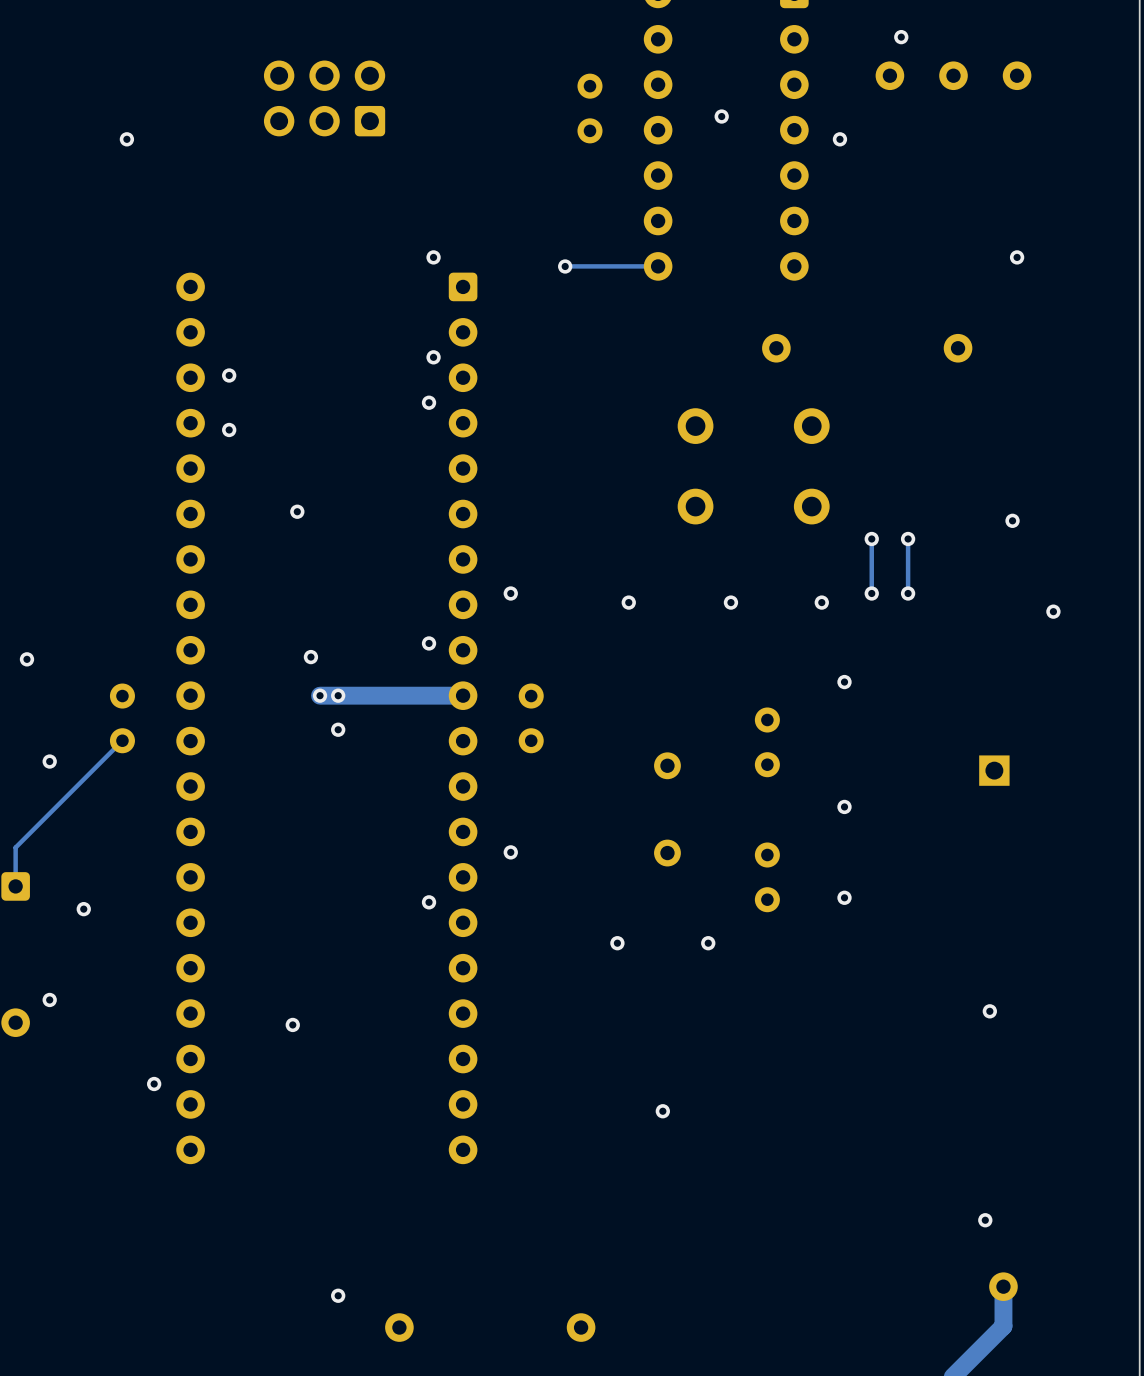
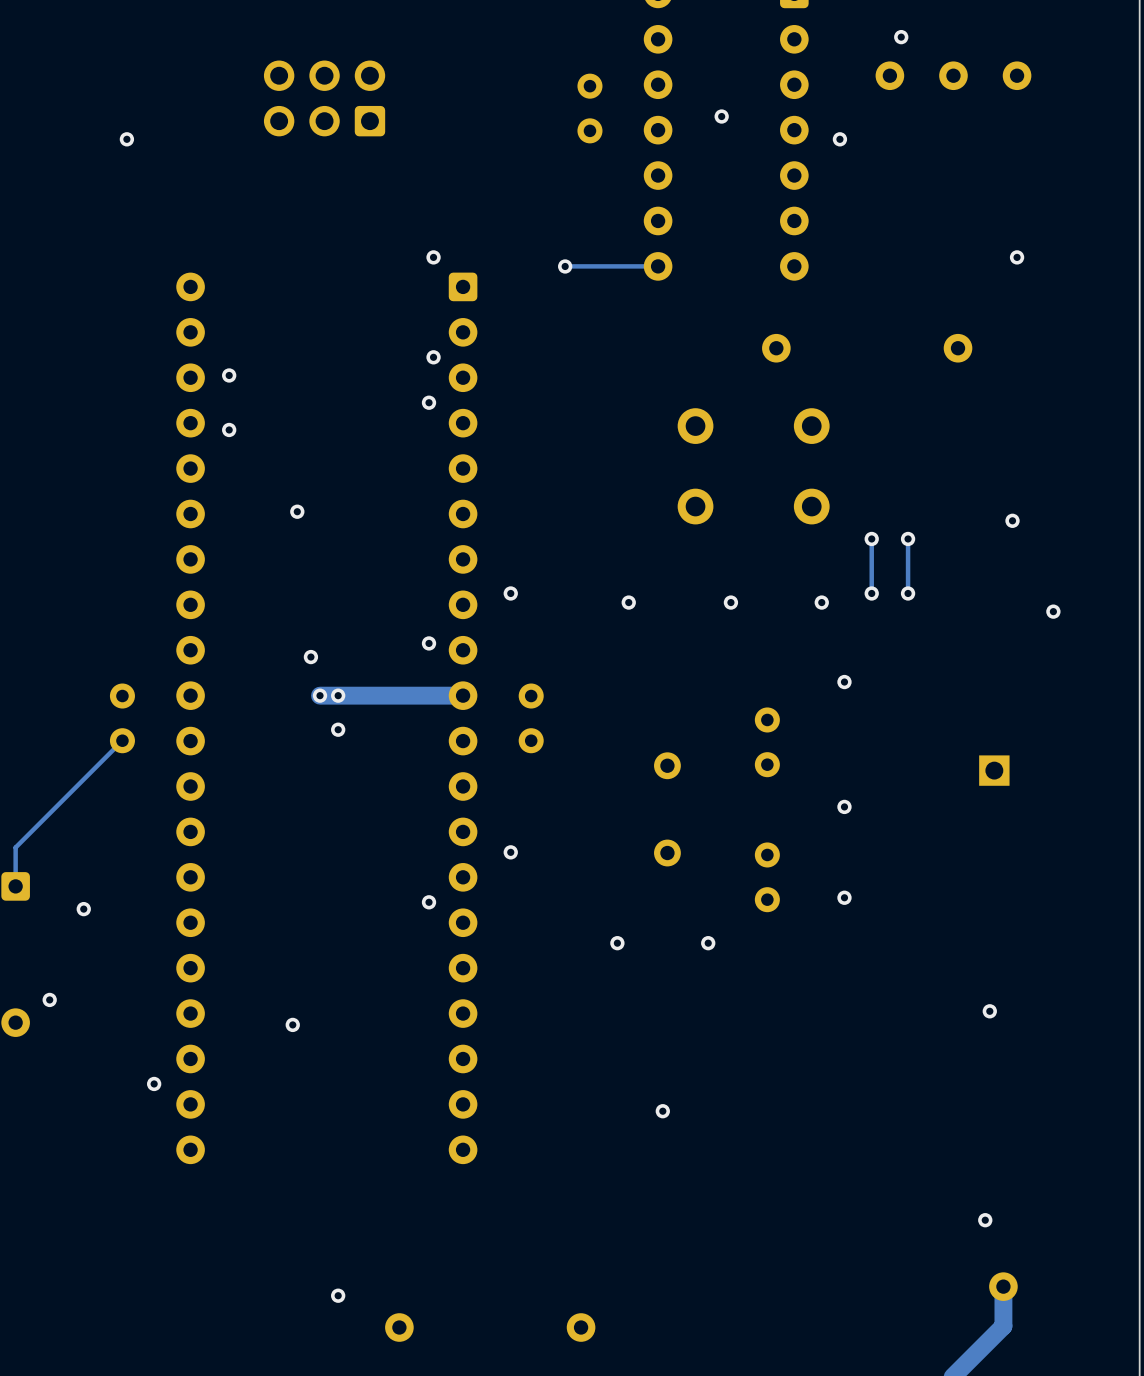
via: (26, 659) -> none
via: (49, 761) -> none

